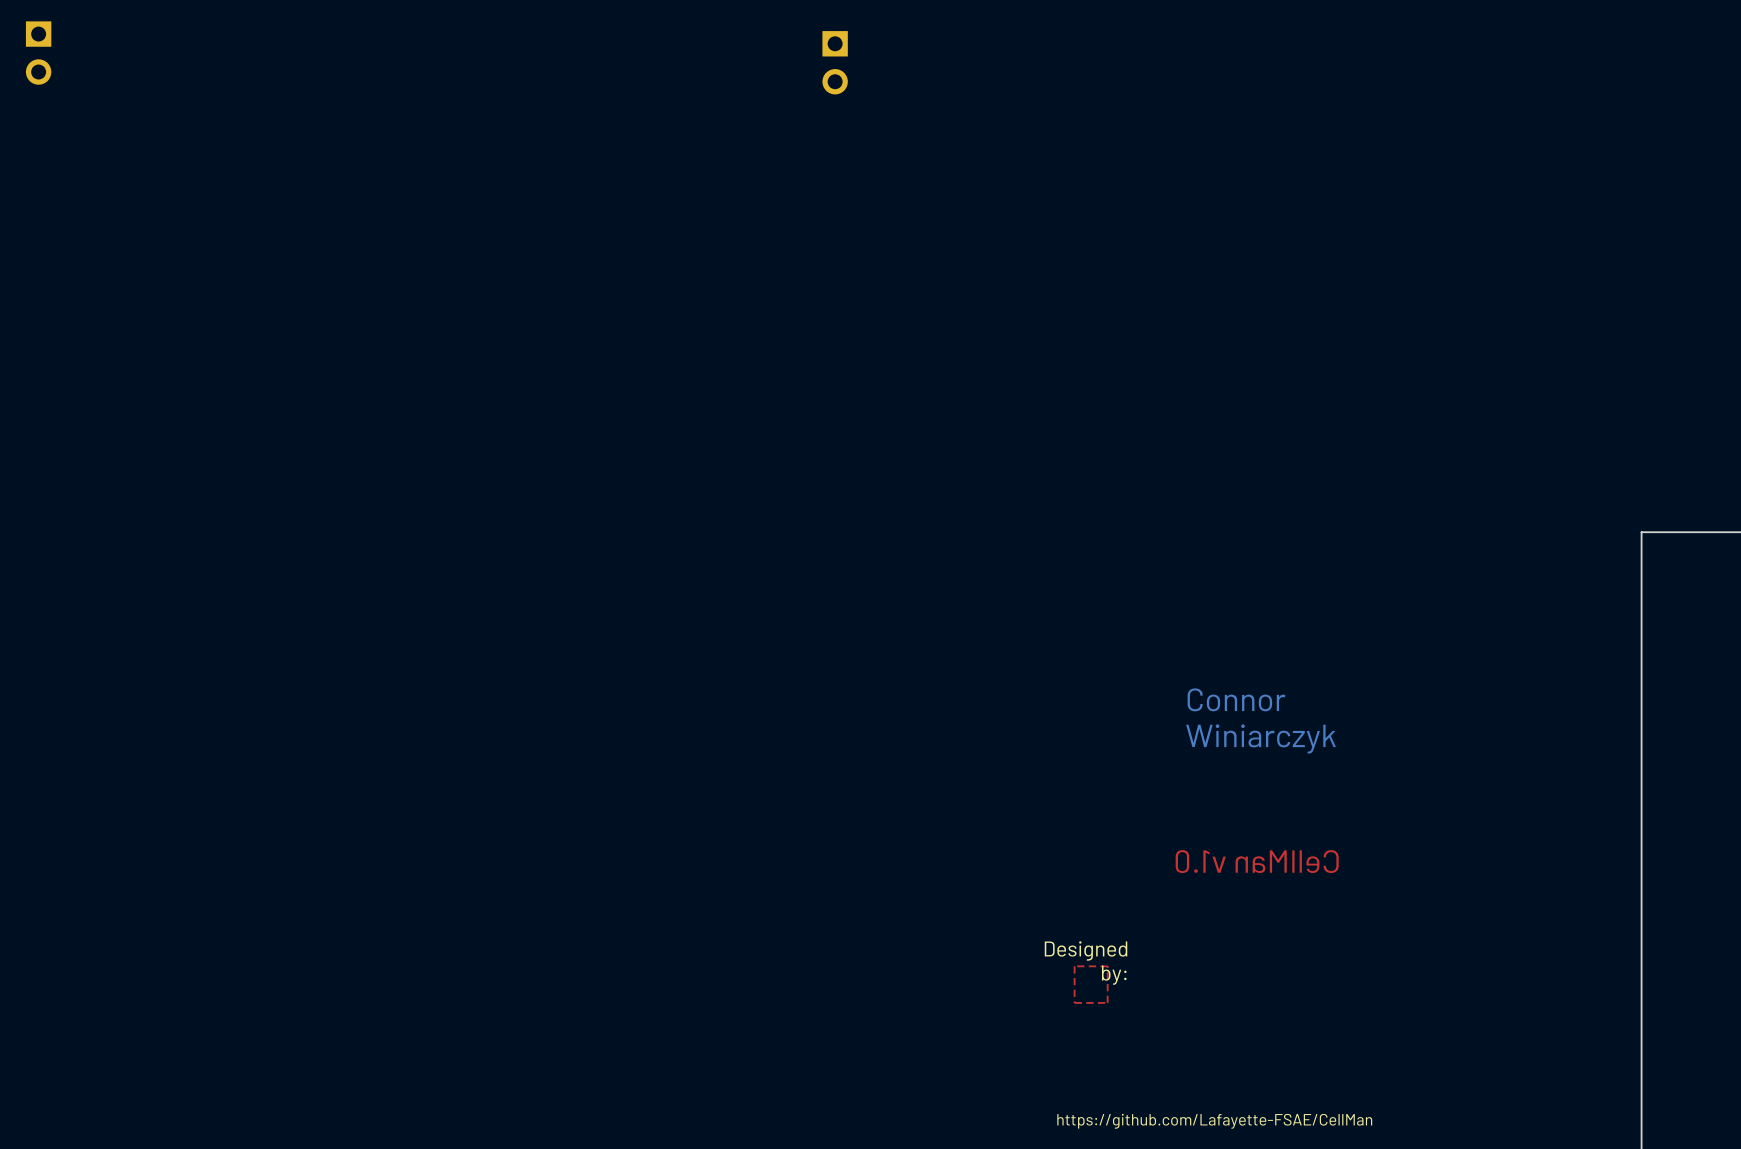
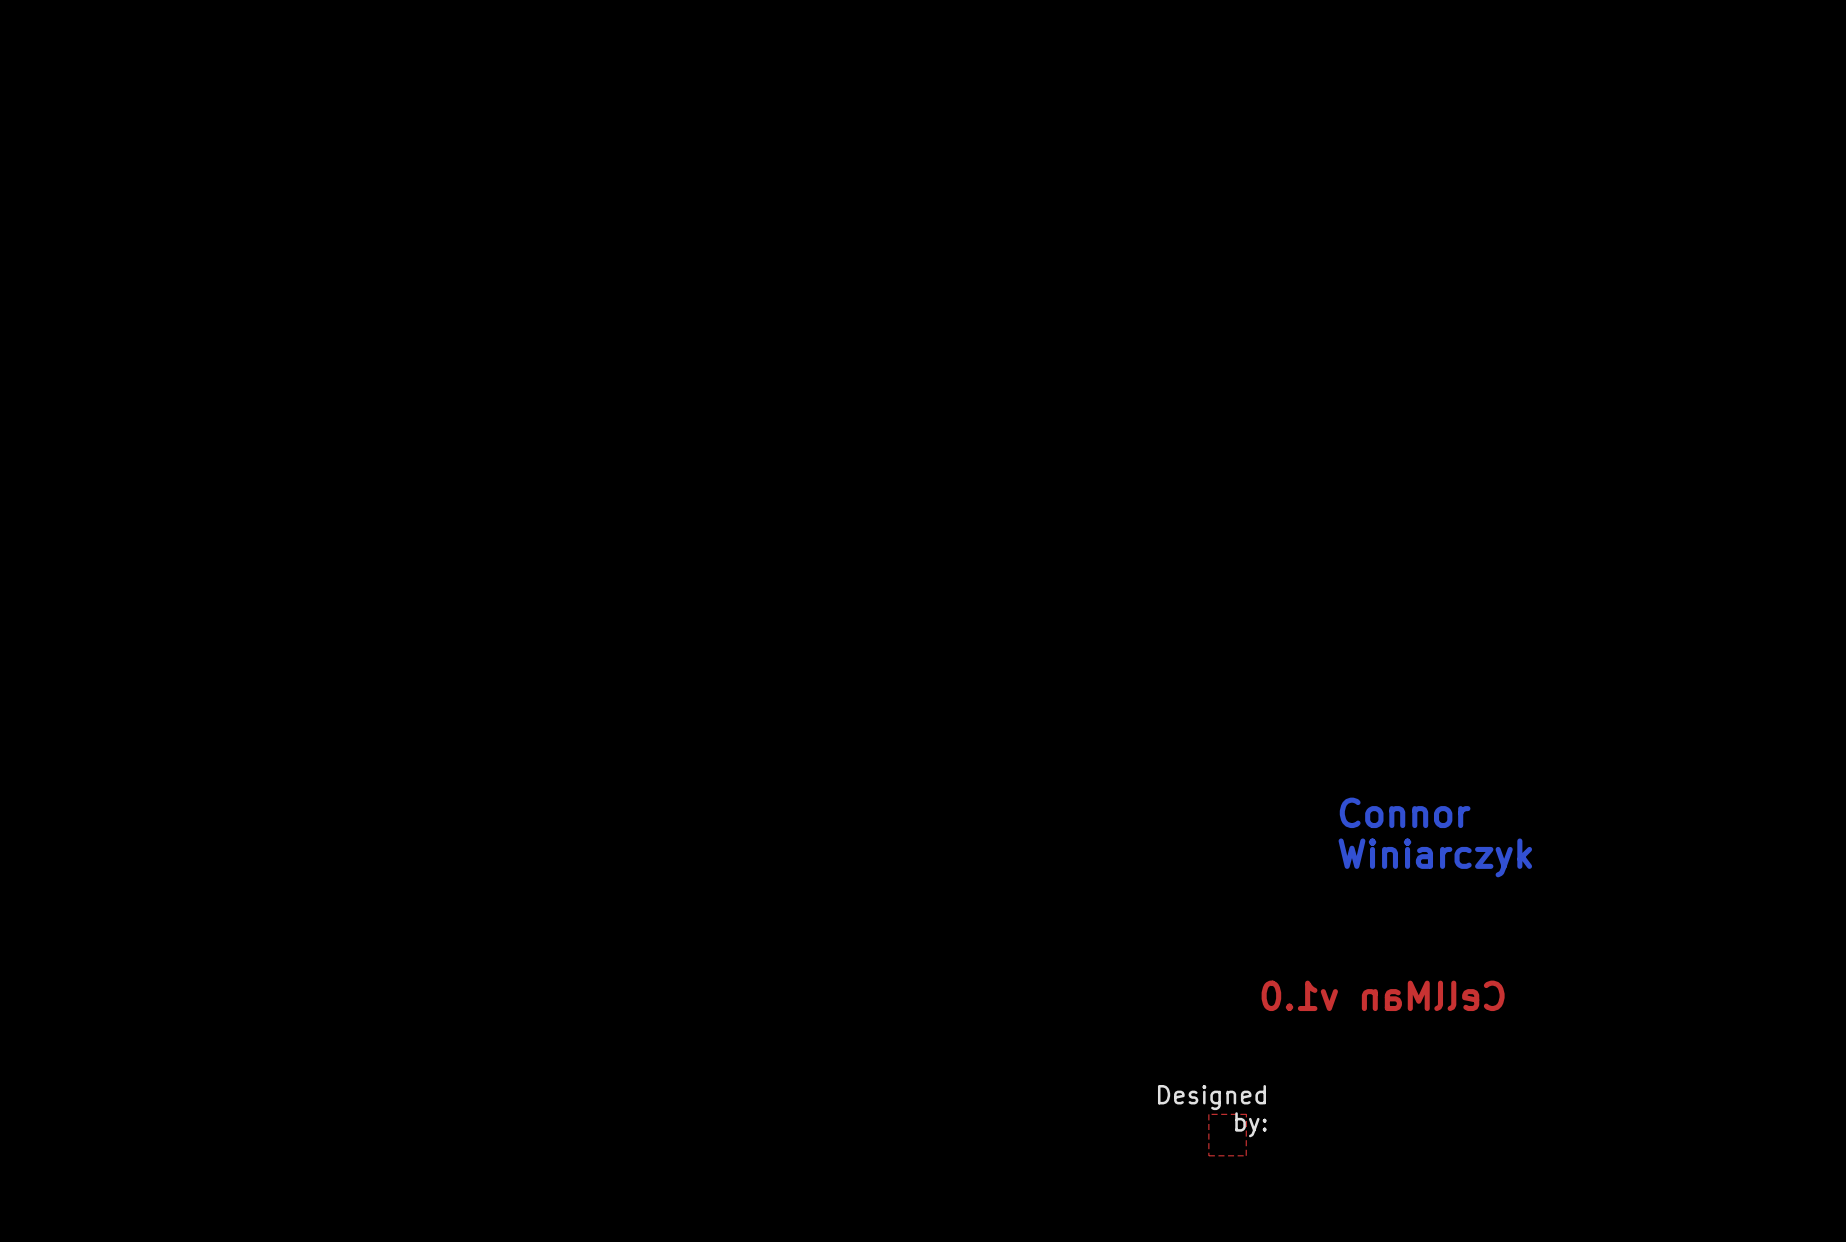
part: (38, 53) -> none
part: (835, 62) -> none

